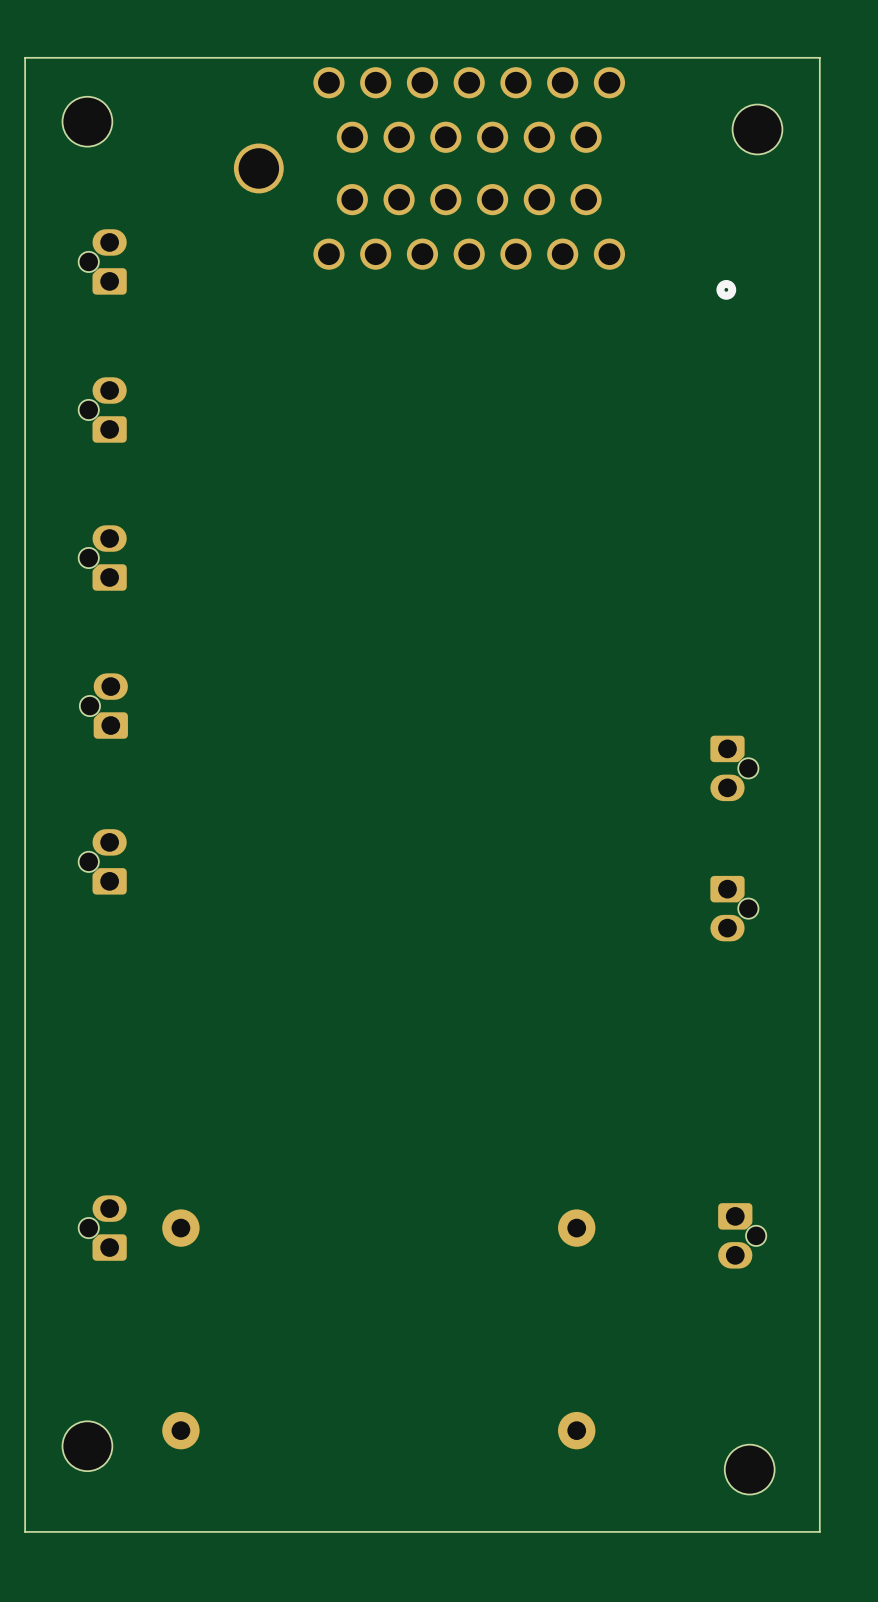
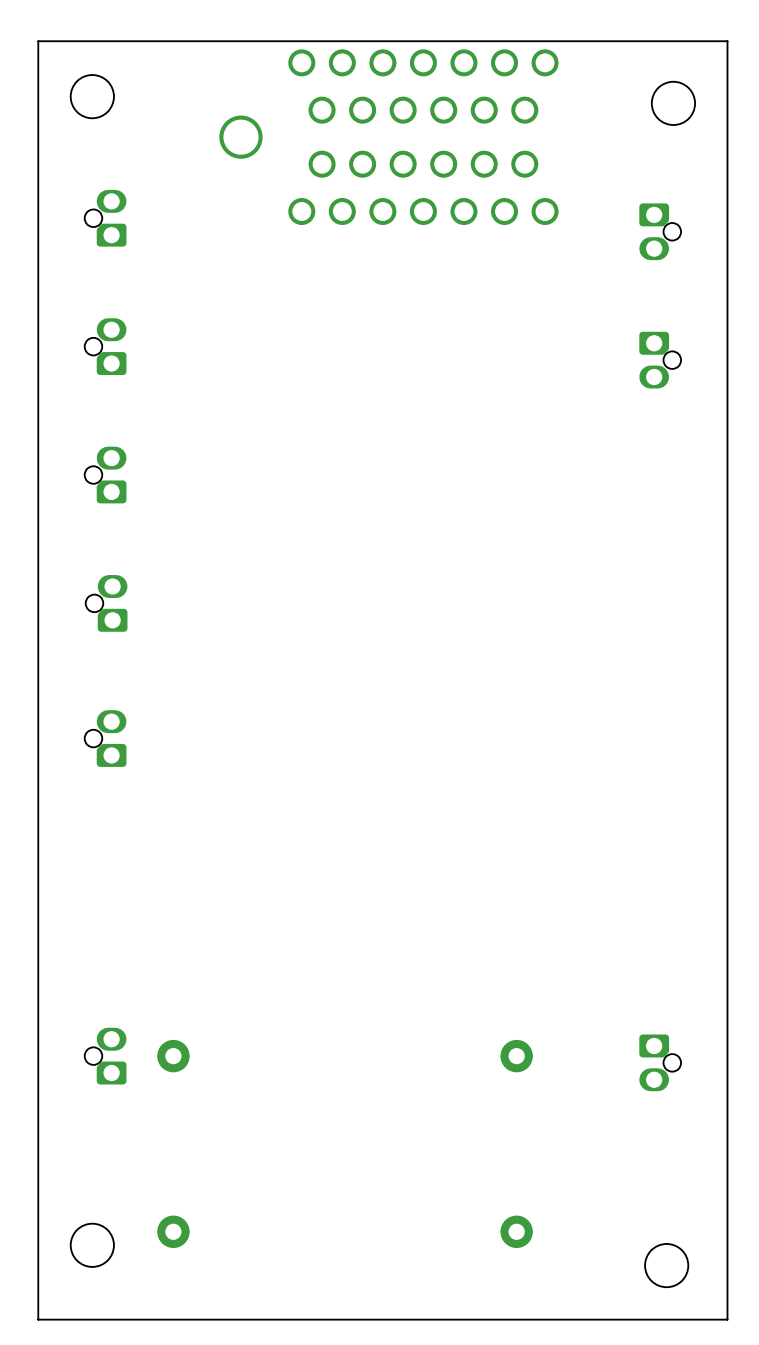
part: none -> (660, 231)
part: (726, 289) -> none
part: none -> (660, 360)
part: (734, 768) -> none
part: (734, 908) -> none

